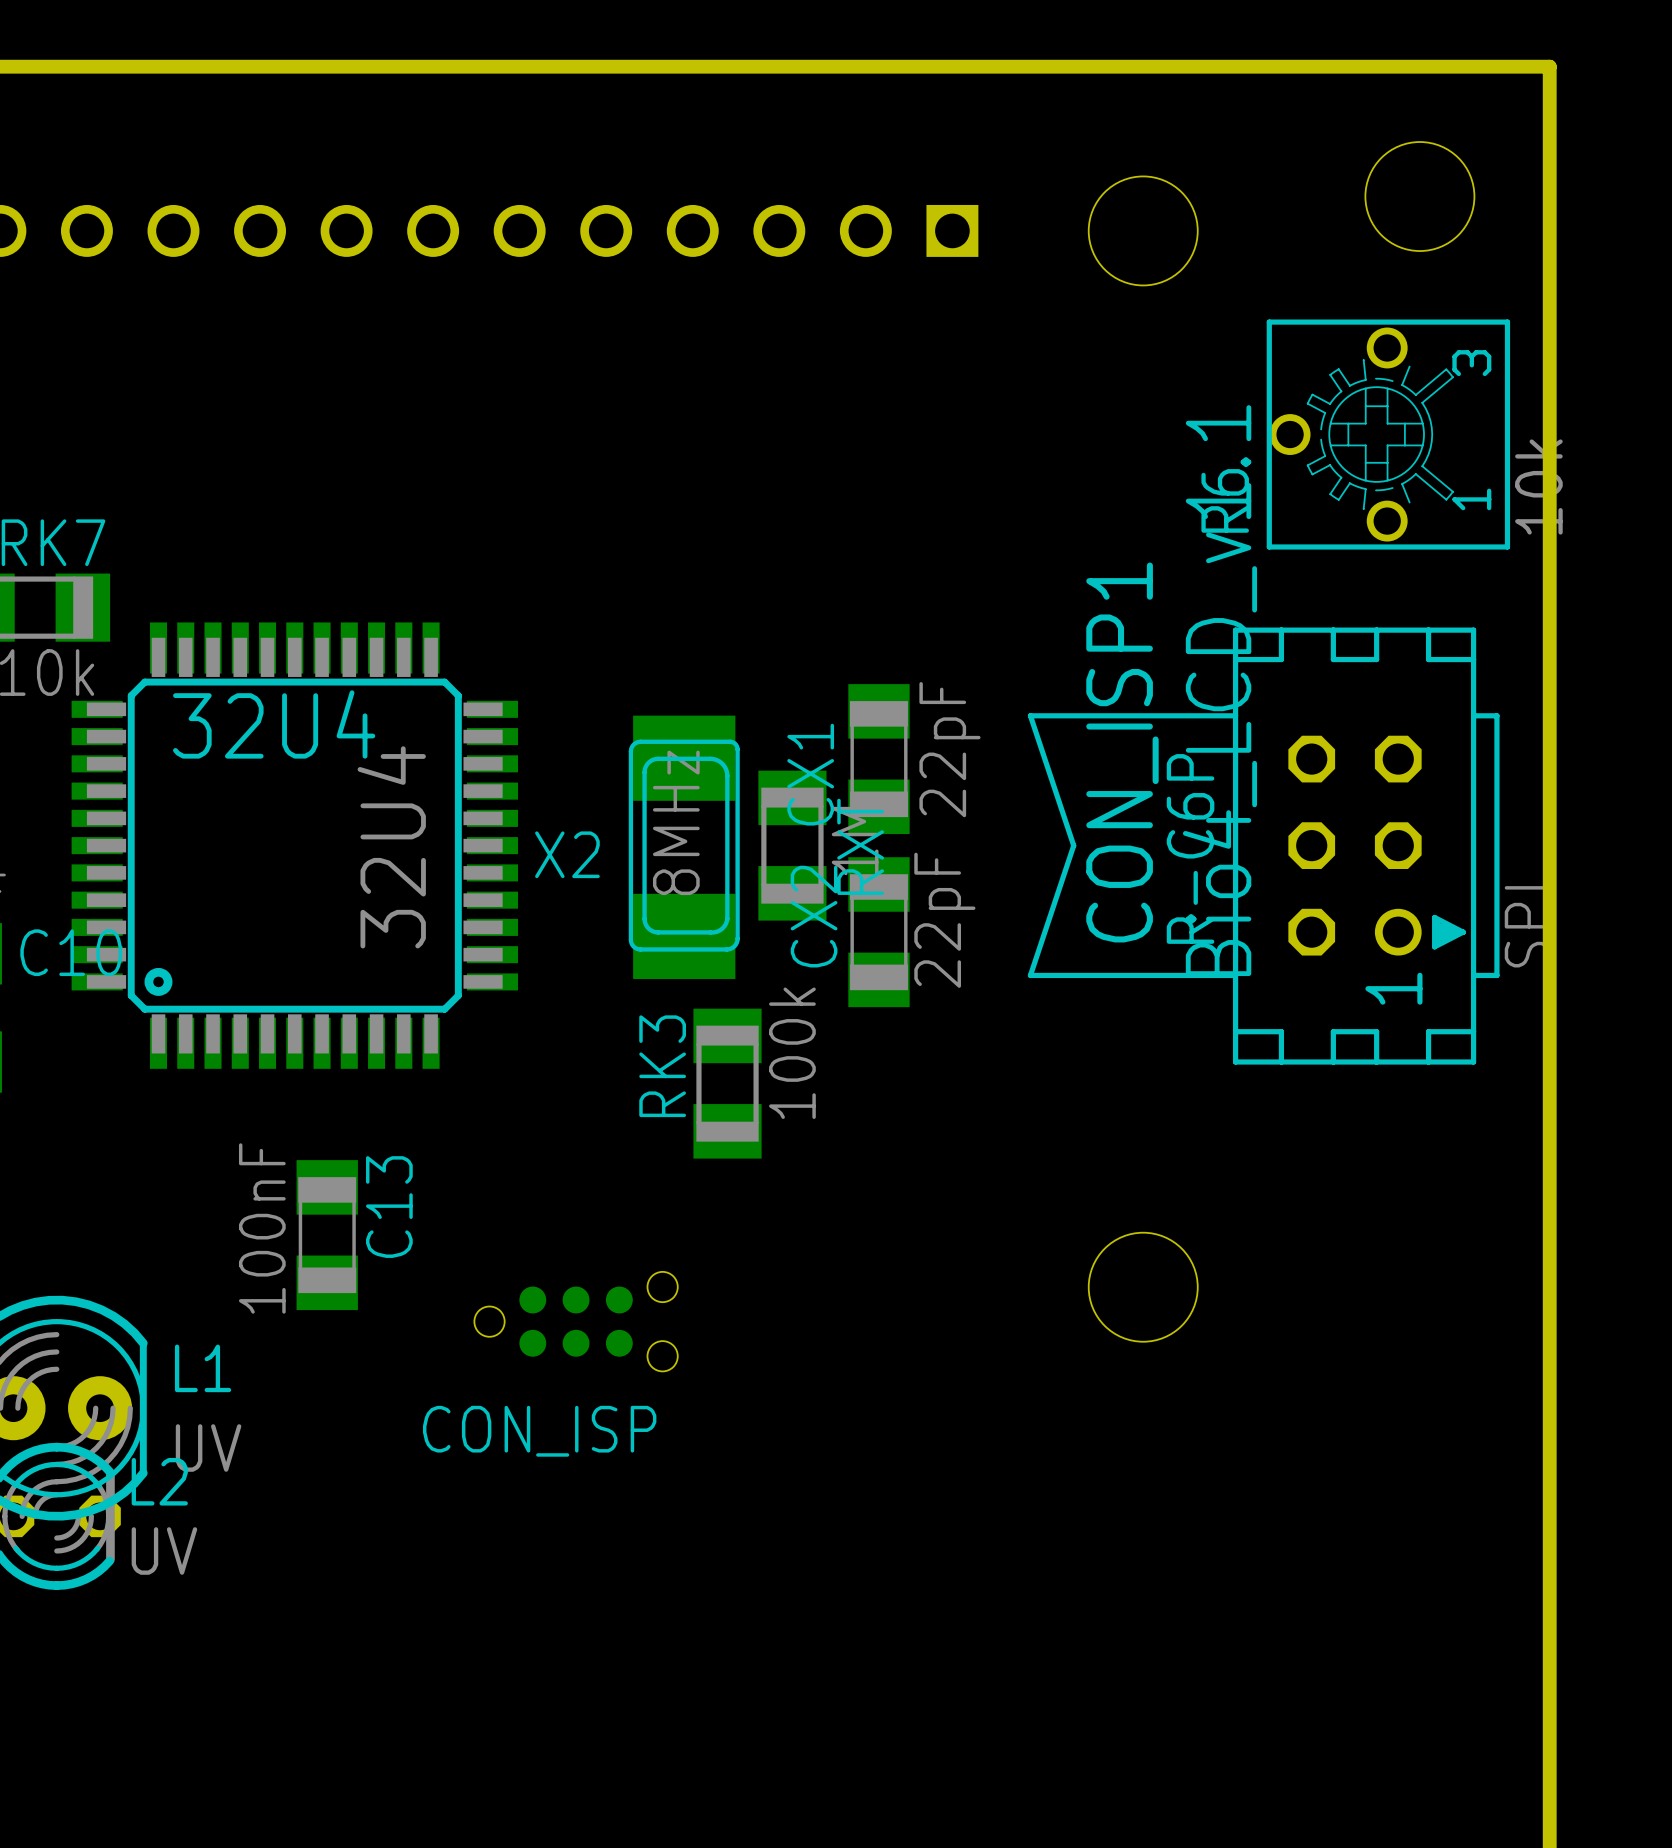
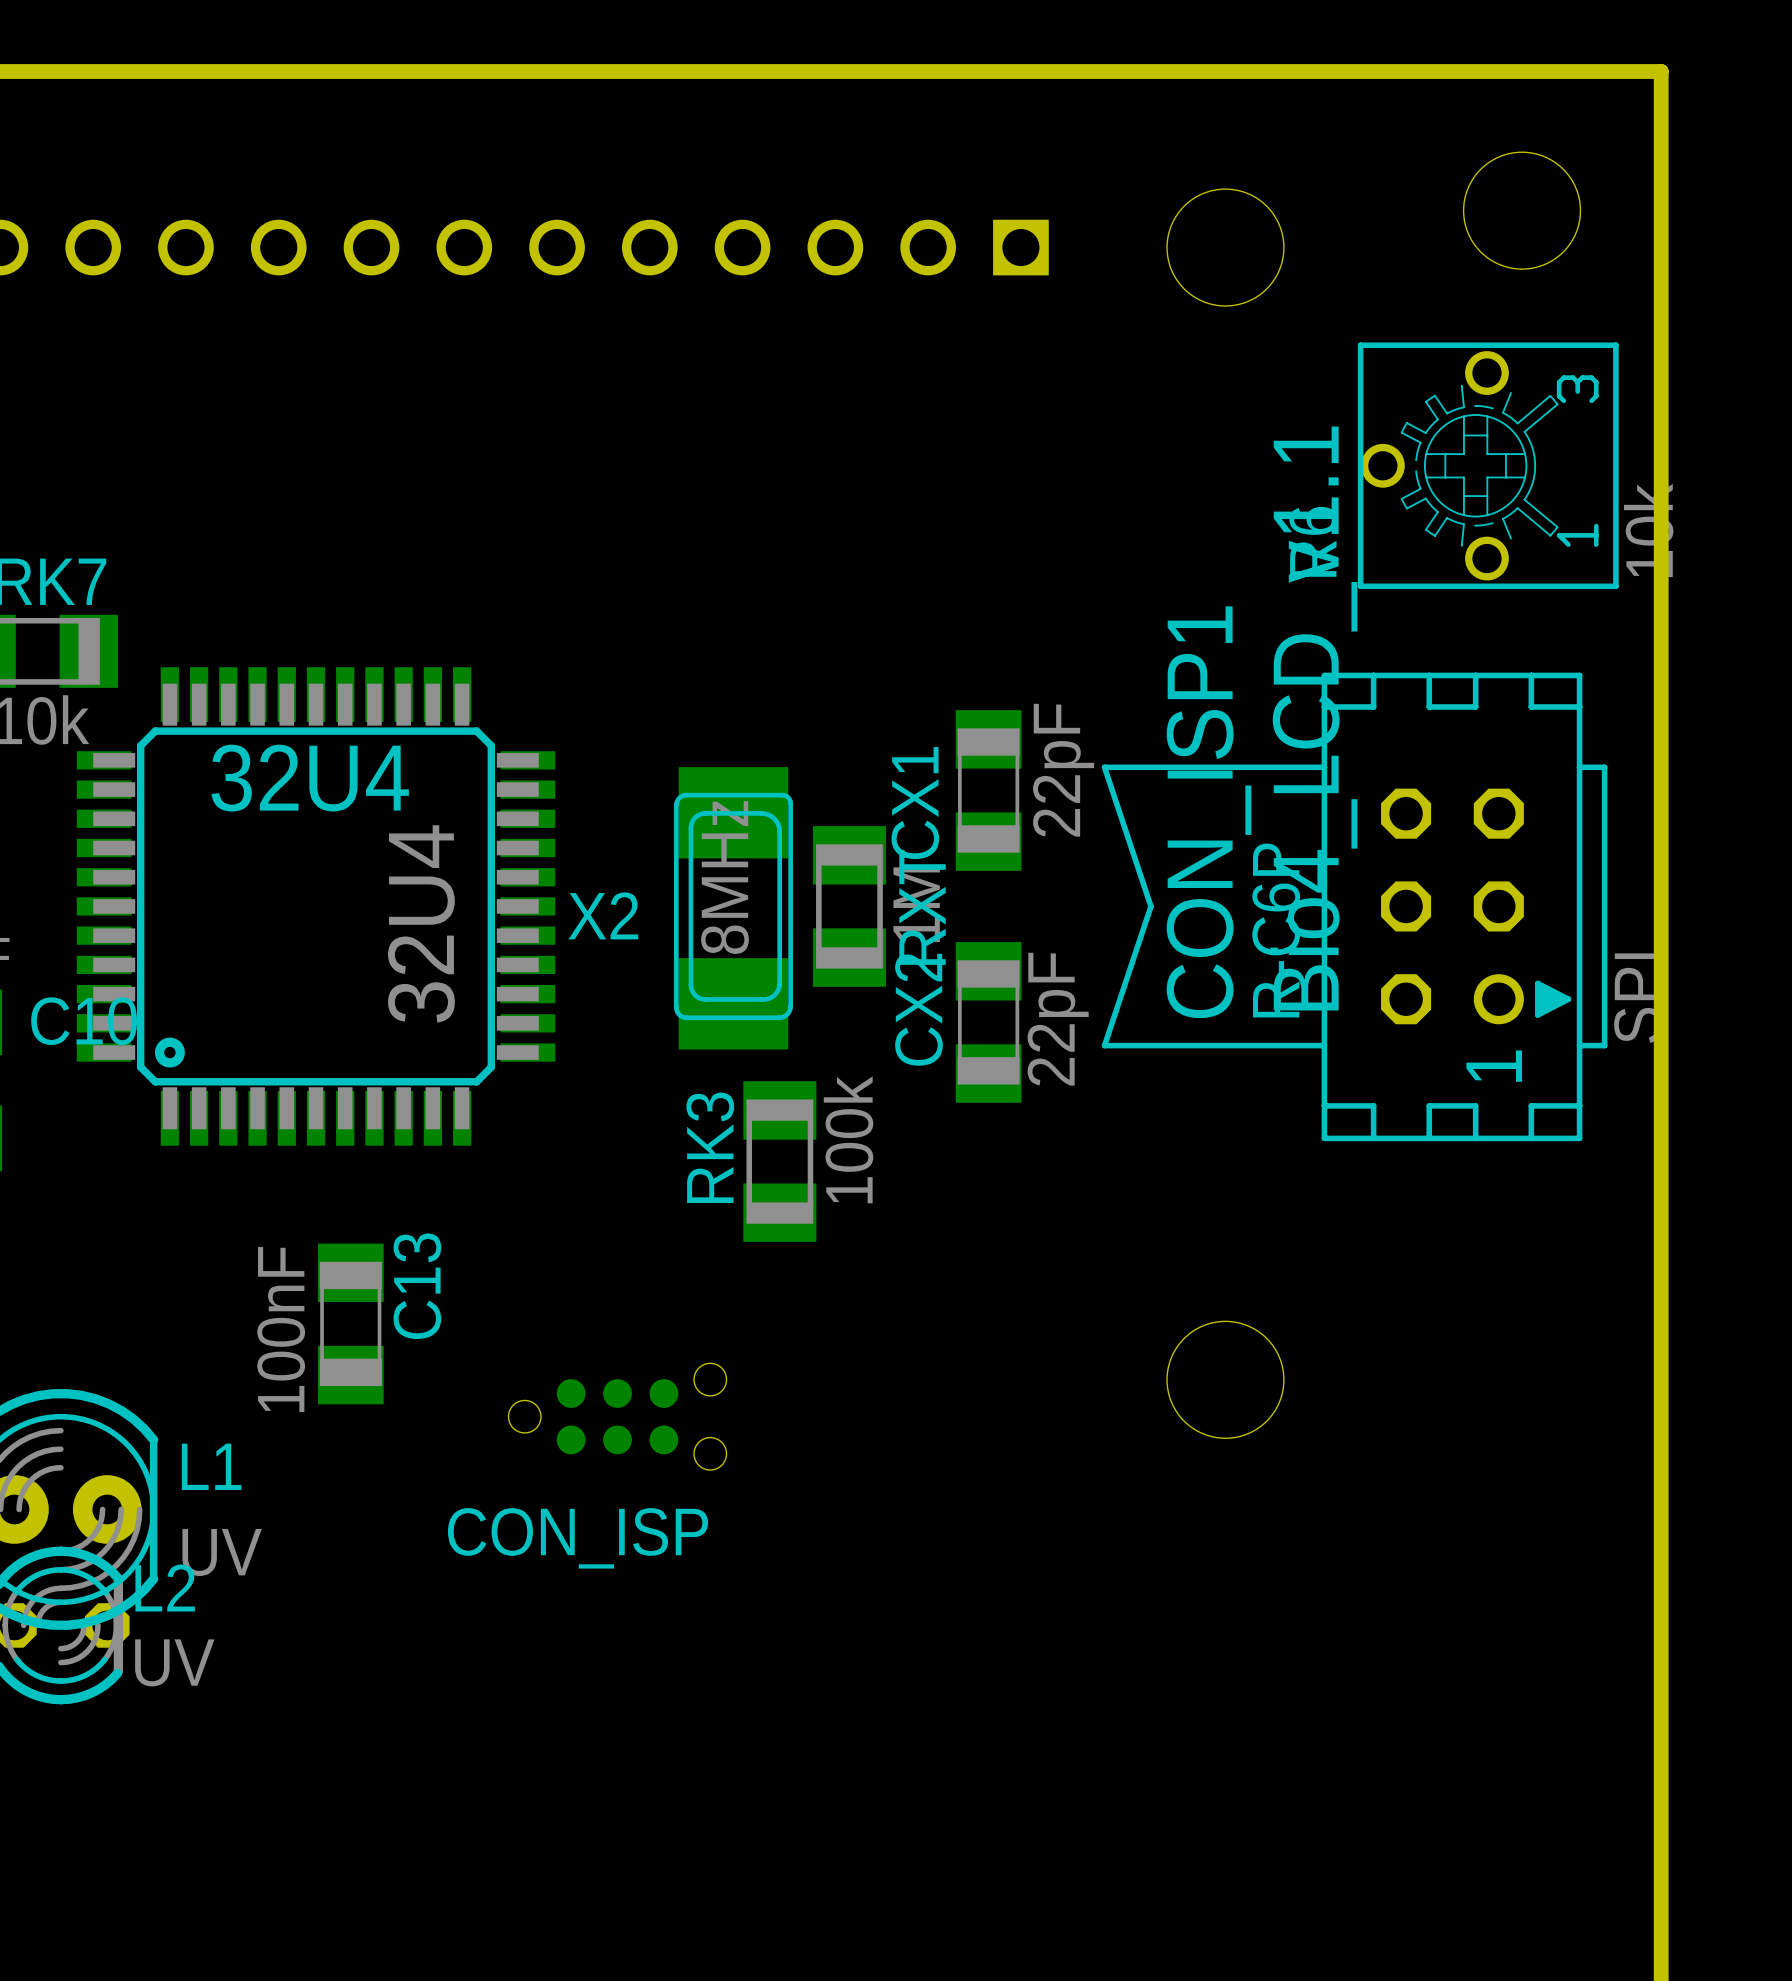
CX1 position: (878, 759) -> (988, 790)
CX2 position: (878, 932) -> (988, 1022)

